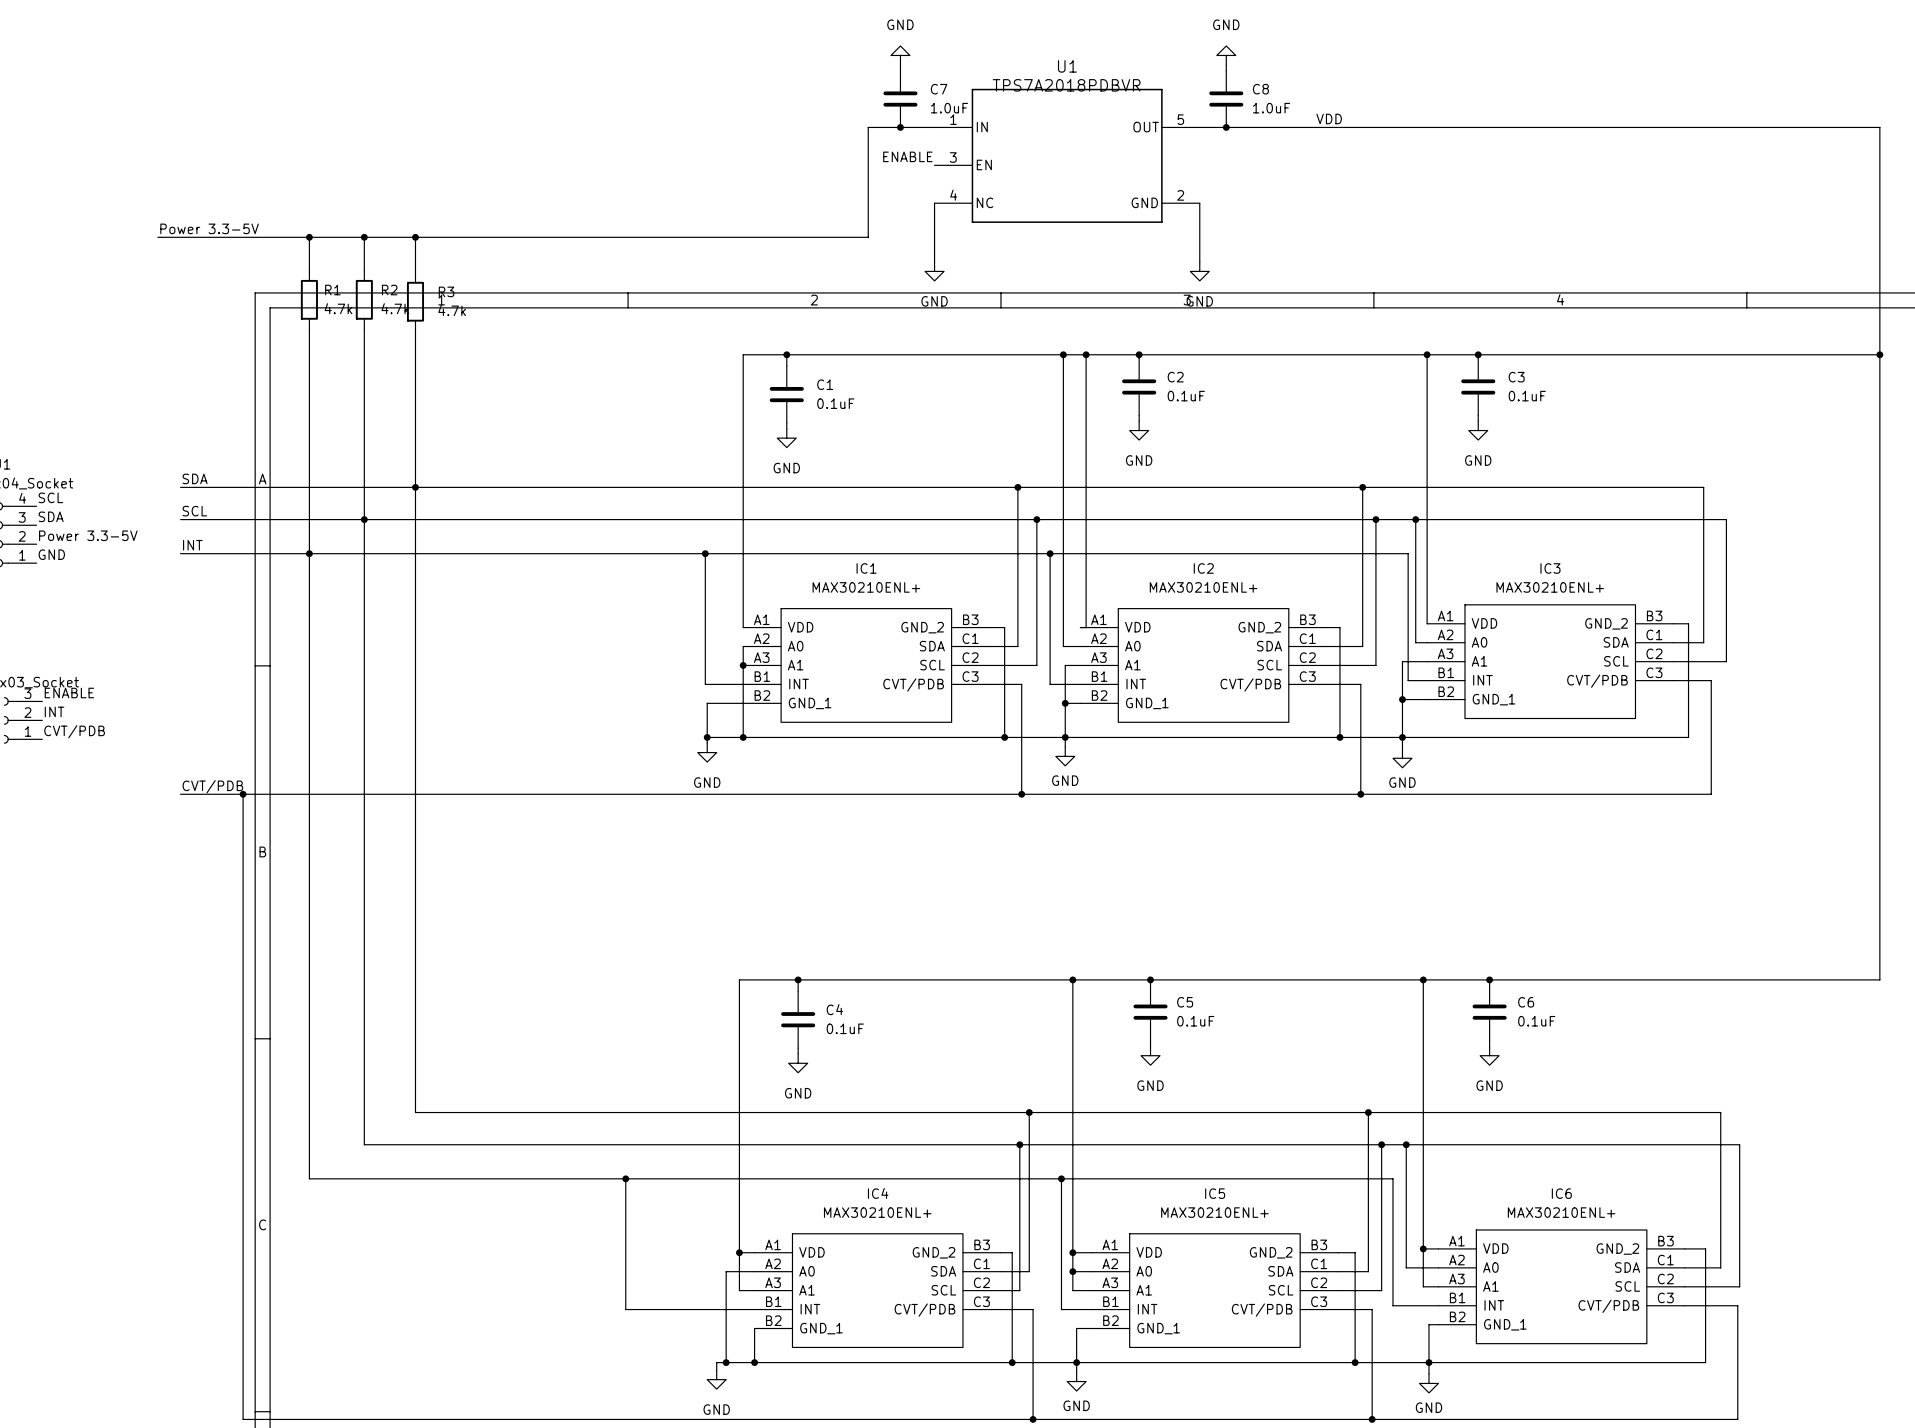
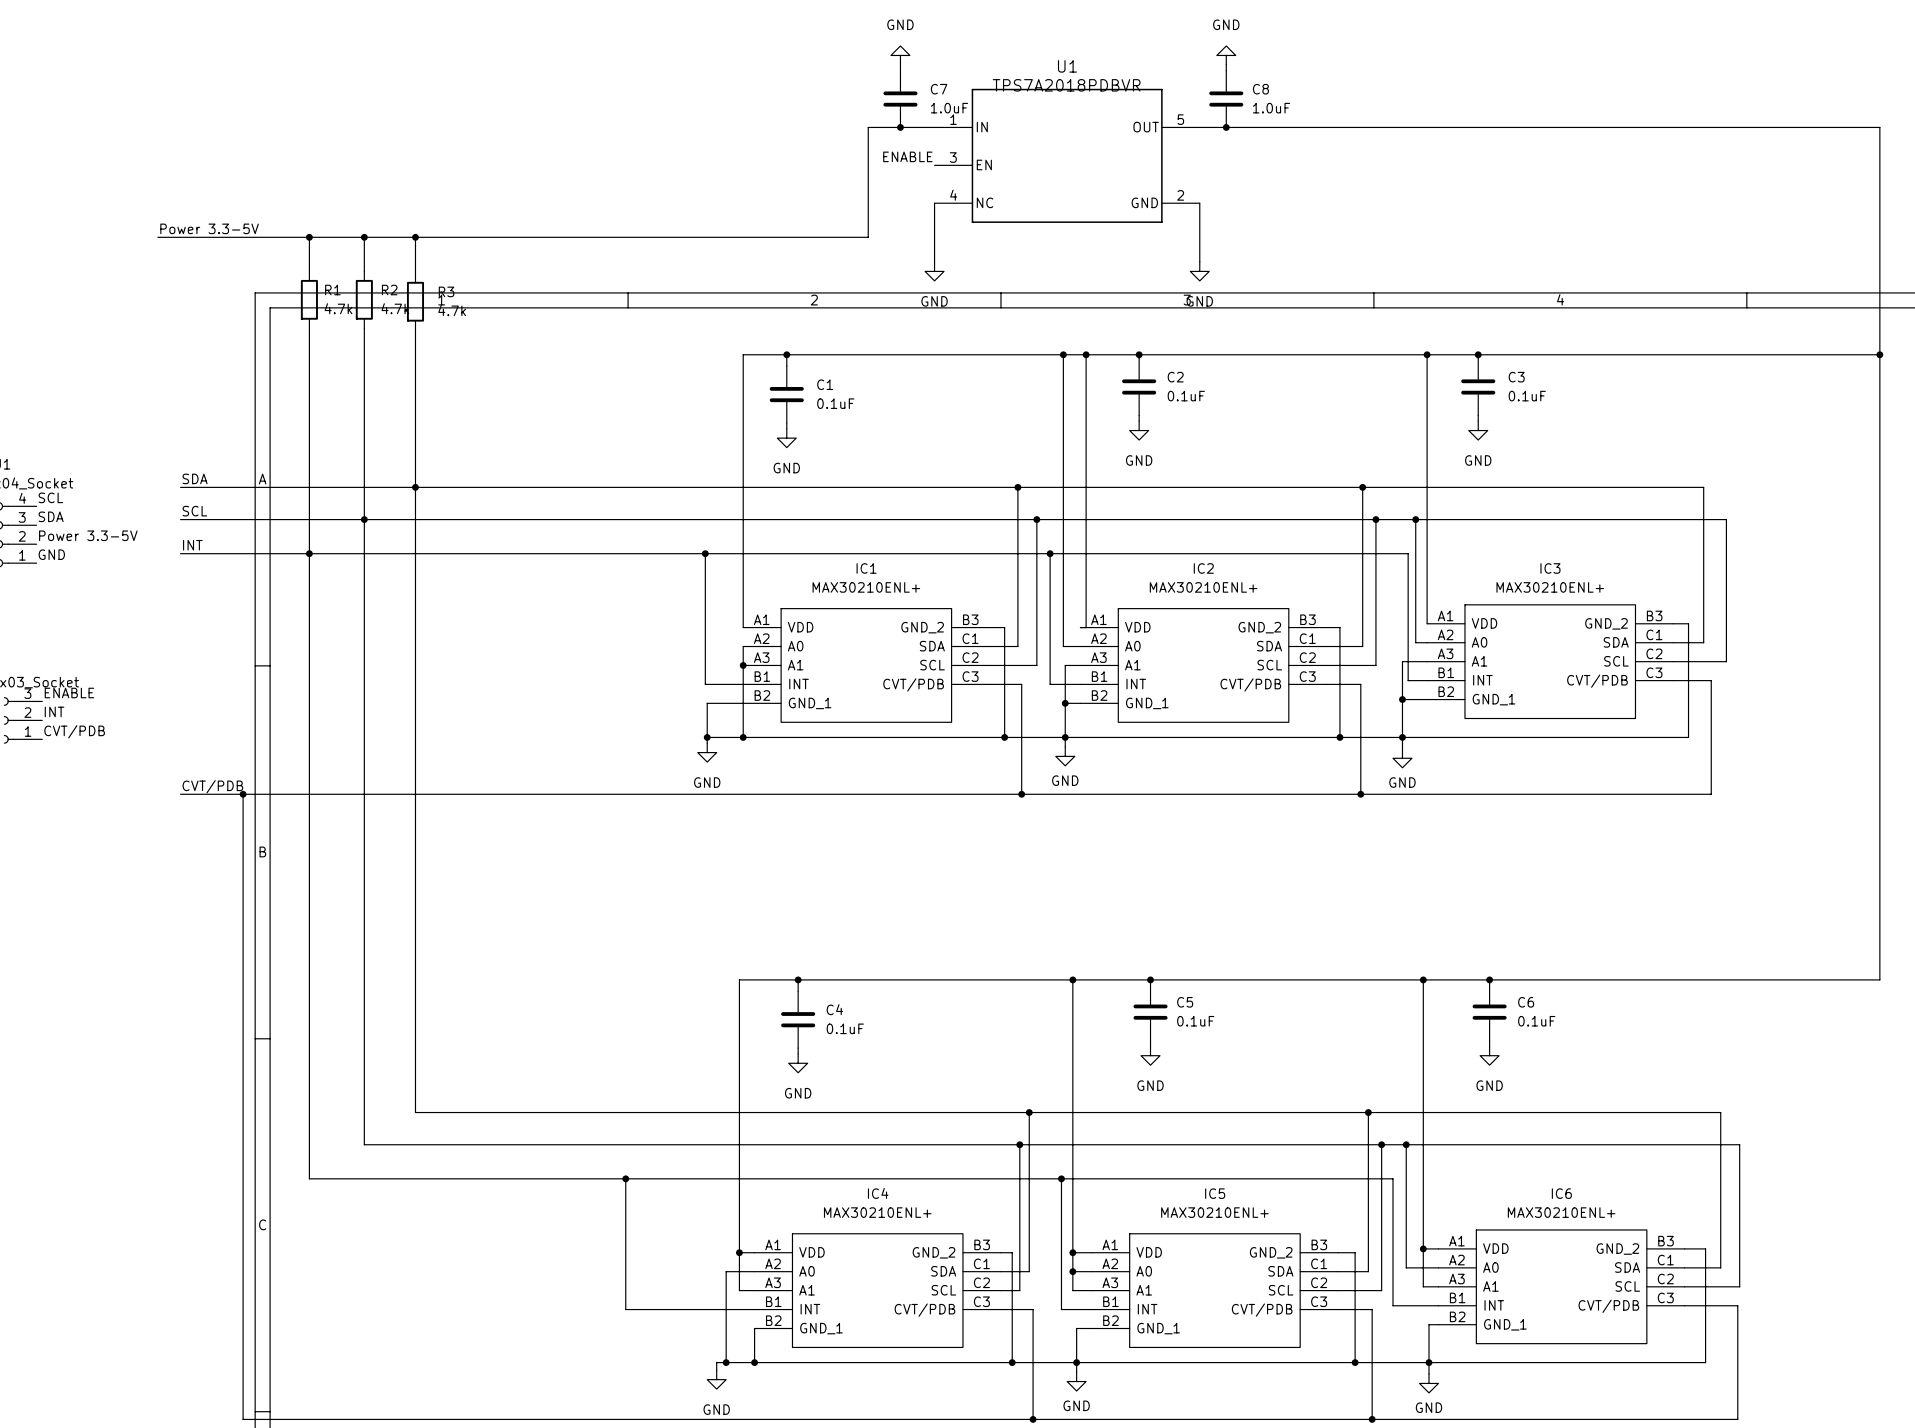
label: VDD (1329, 118) -> none

